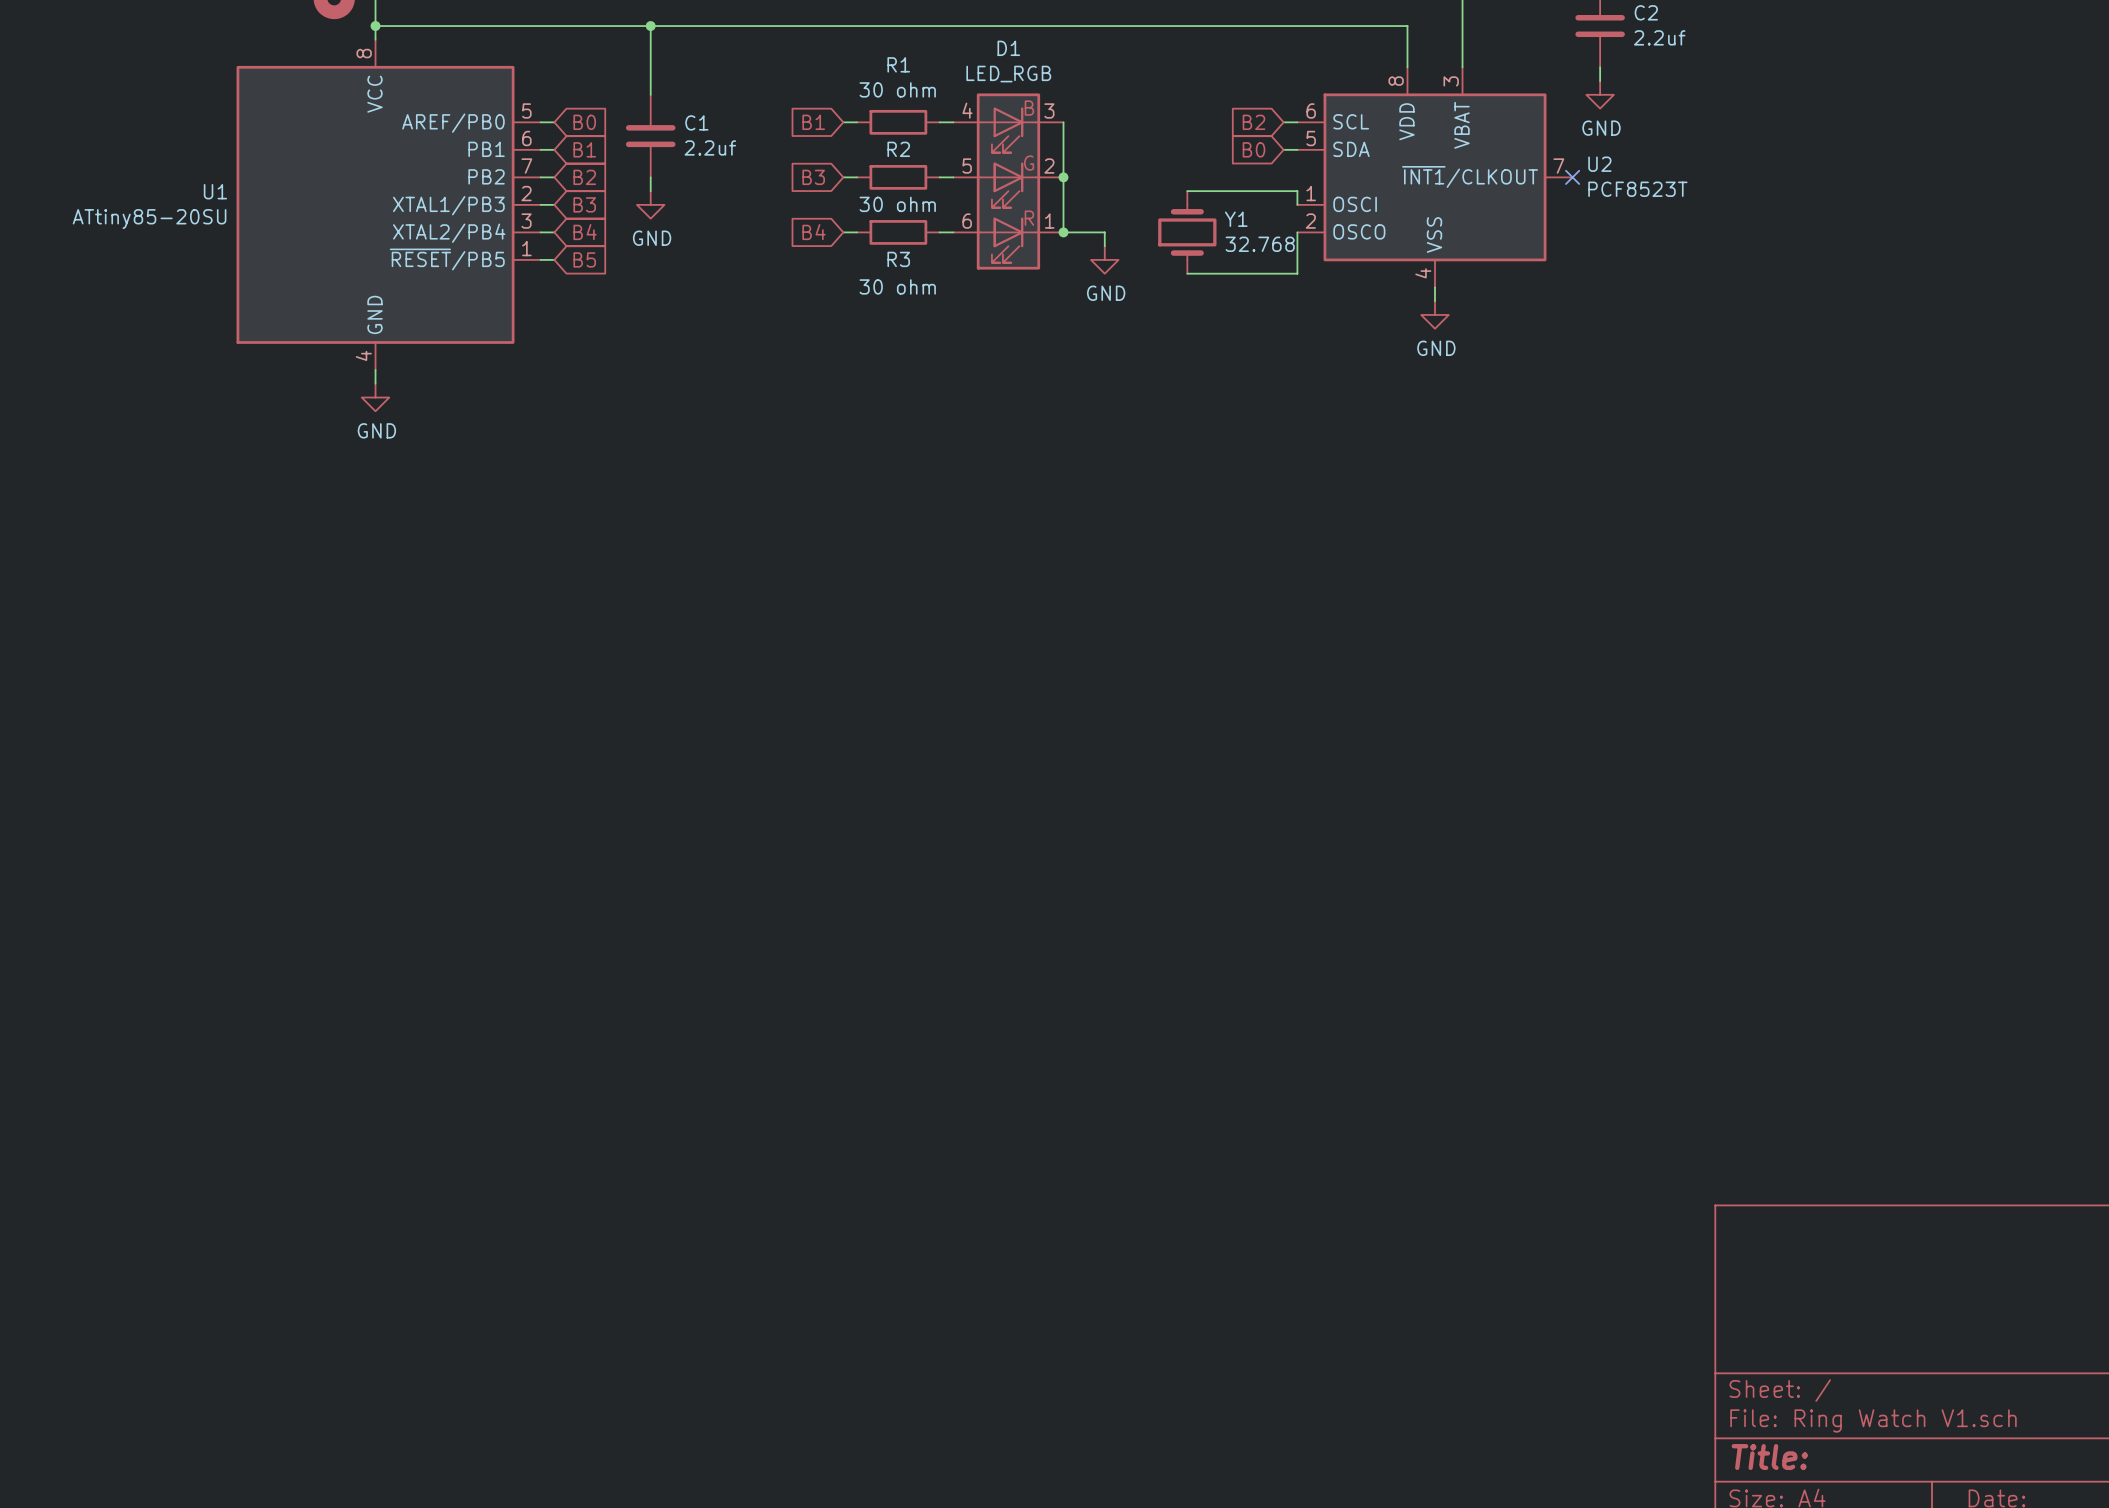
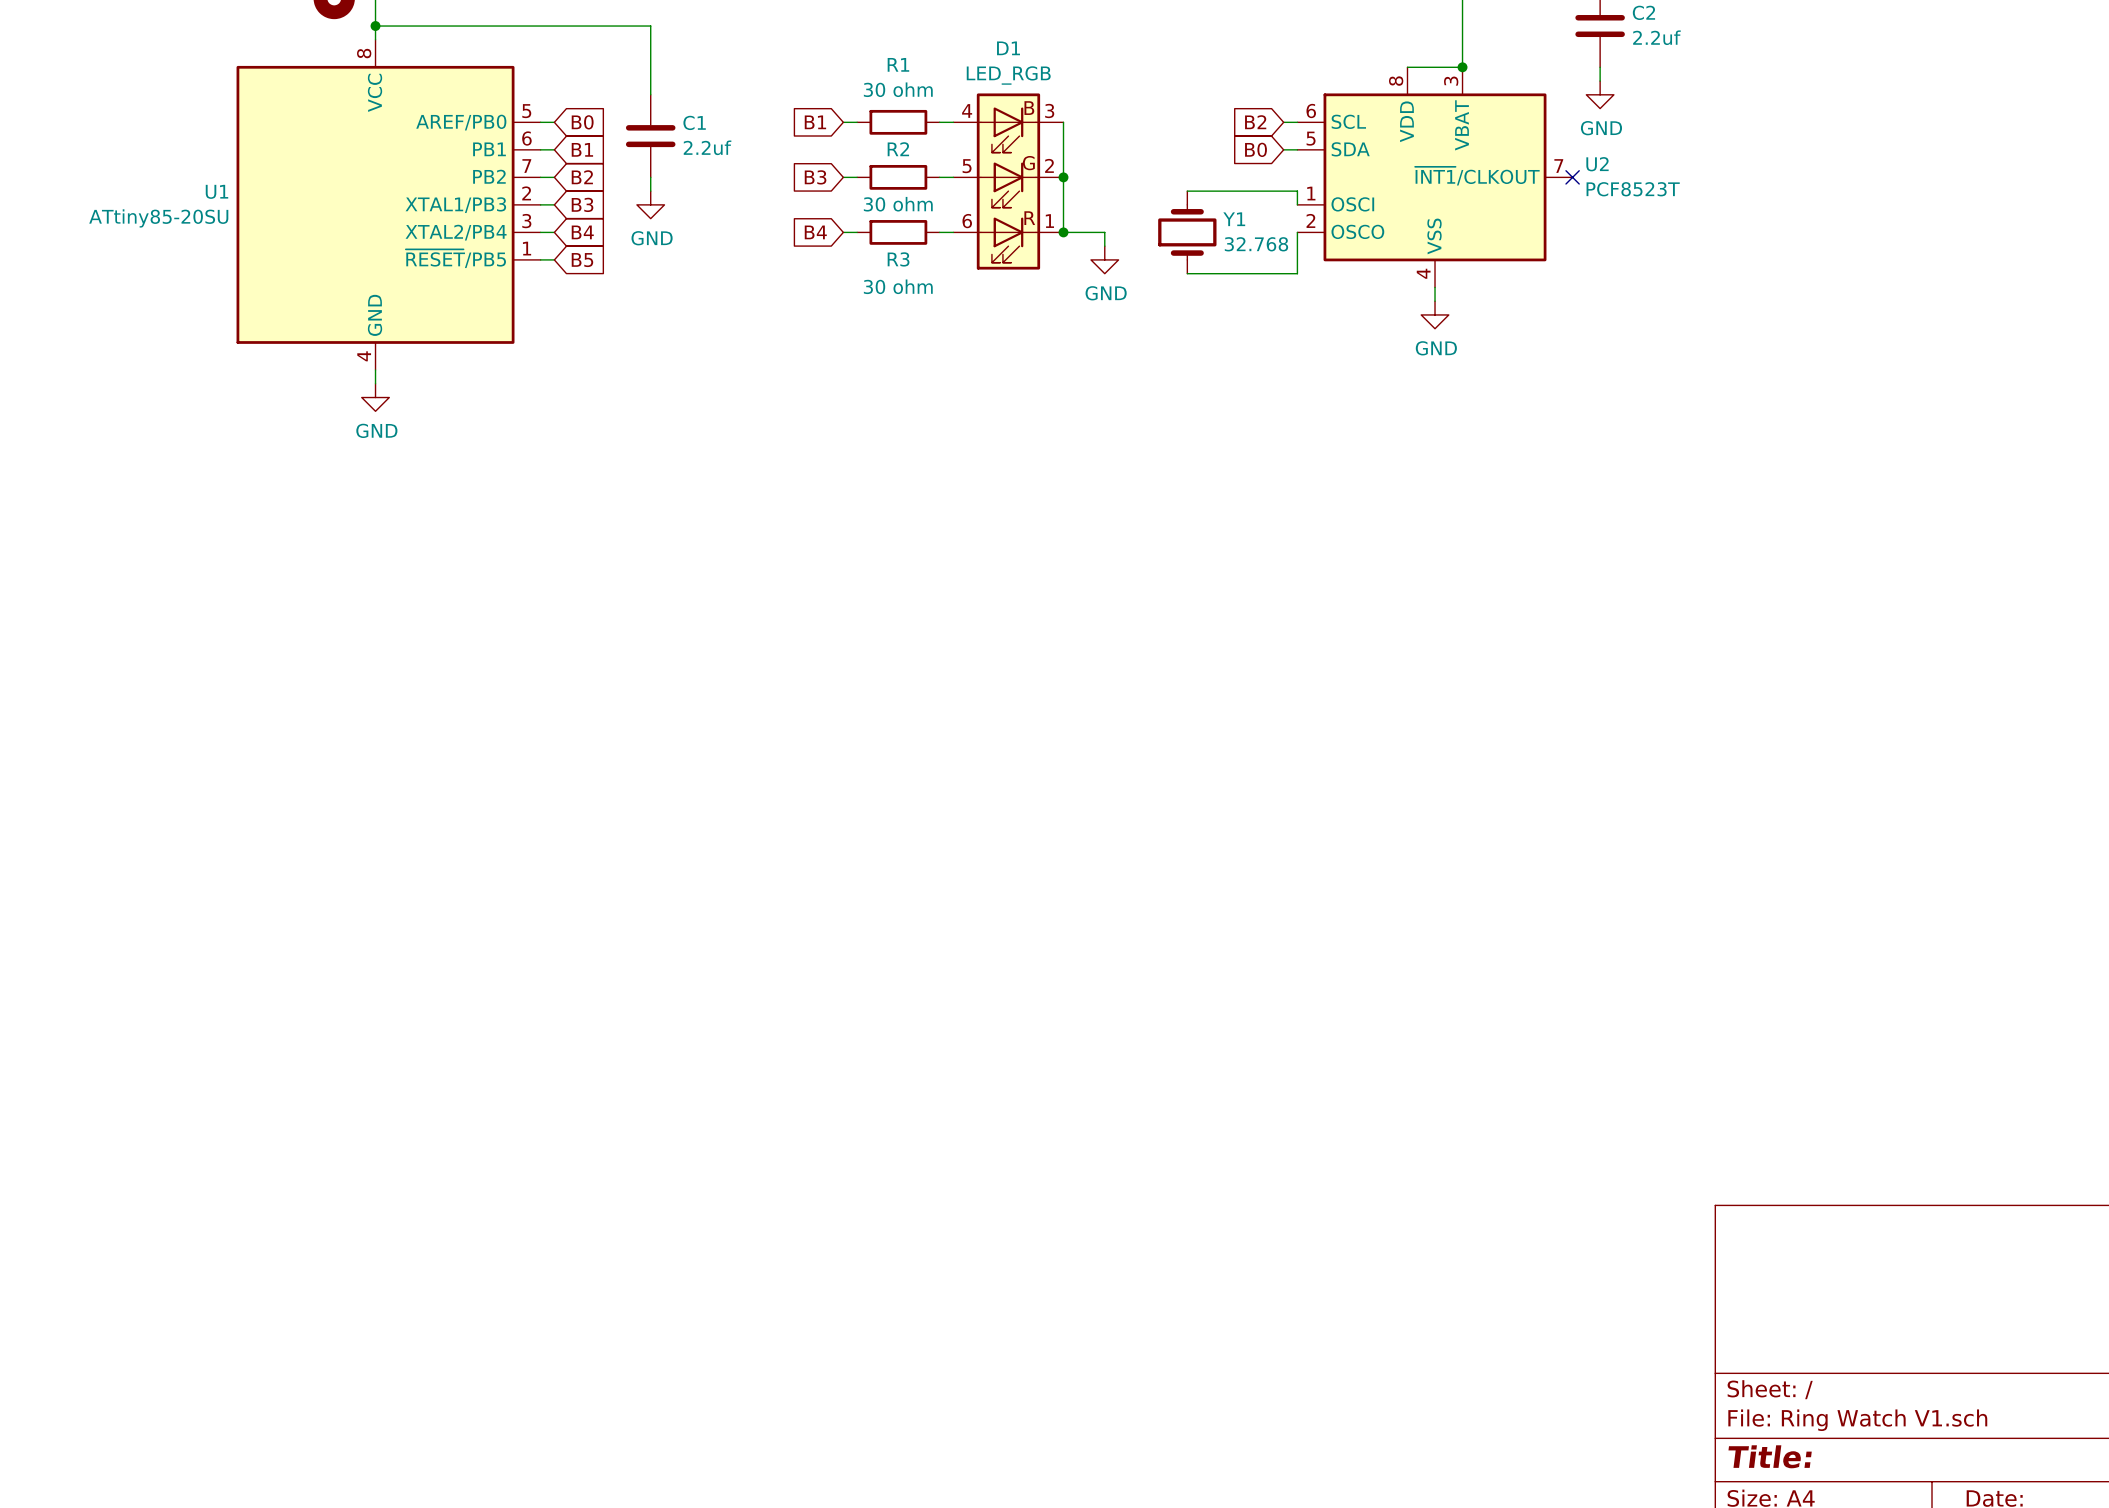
wire: (650, 26) (1407, 26) (1407, 67) -> (1462, 67) (1407, 67)
junction: (650, 26) -> none
junction: none -> (1462, 67)

